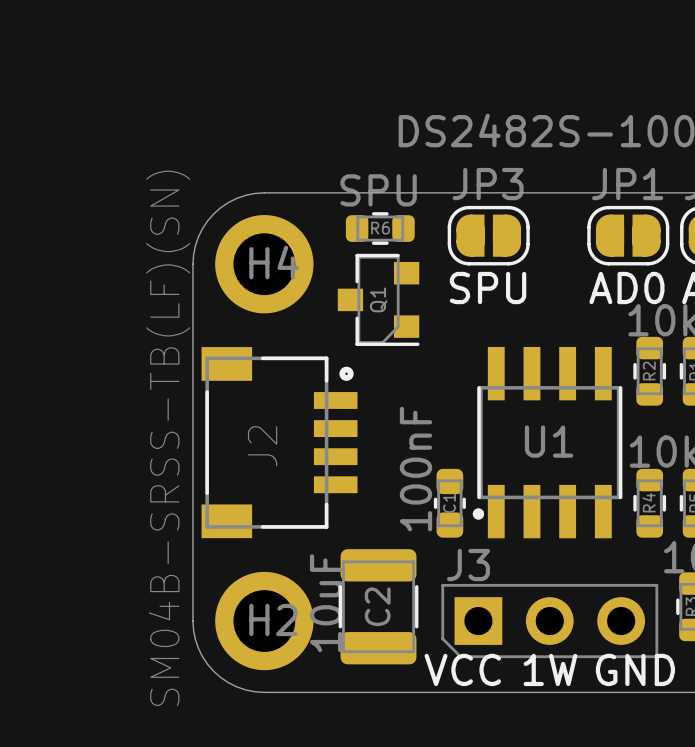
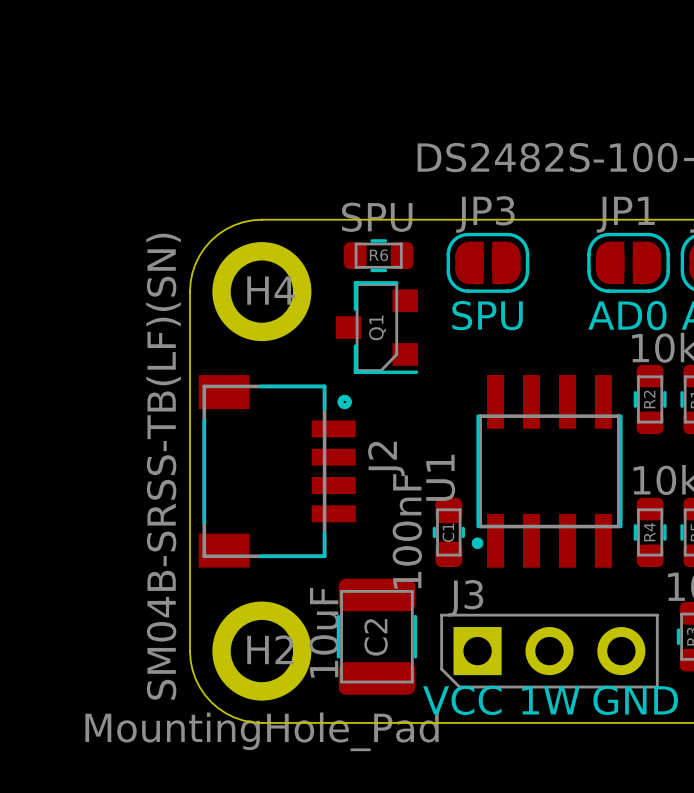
U1 name rotation: 0° (549, 441) -> 90° counterclockwise (440, 477)
U1 name position: U1 (549, 441) -> U1 (440, 477)
J2 name position: J2 (262, 446) -> J2 (386, 458)
C1 value position: 100nF (416, 469) -> 100nF (407, 531)
H2 value: none -> MountingHole_Pad (262, 731)

